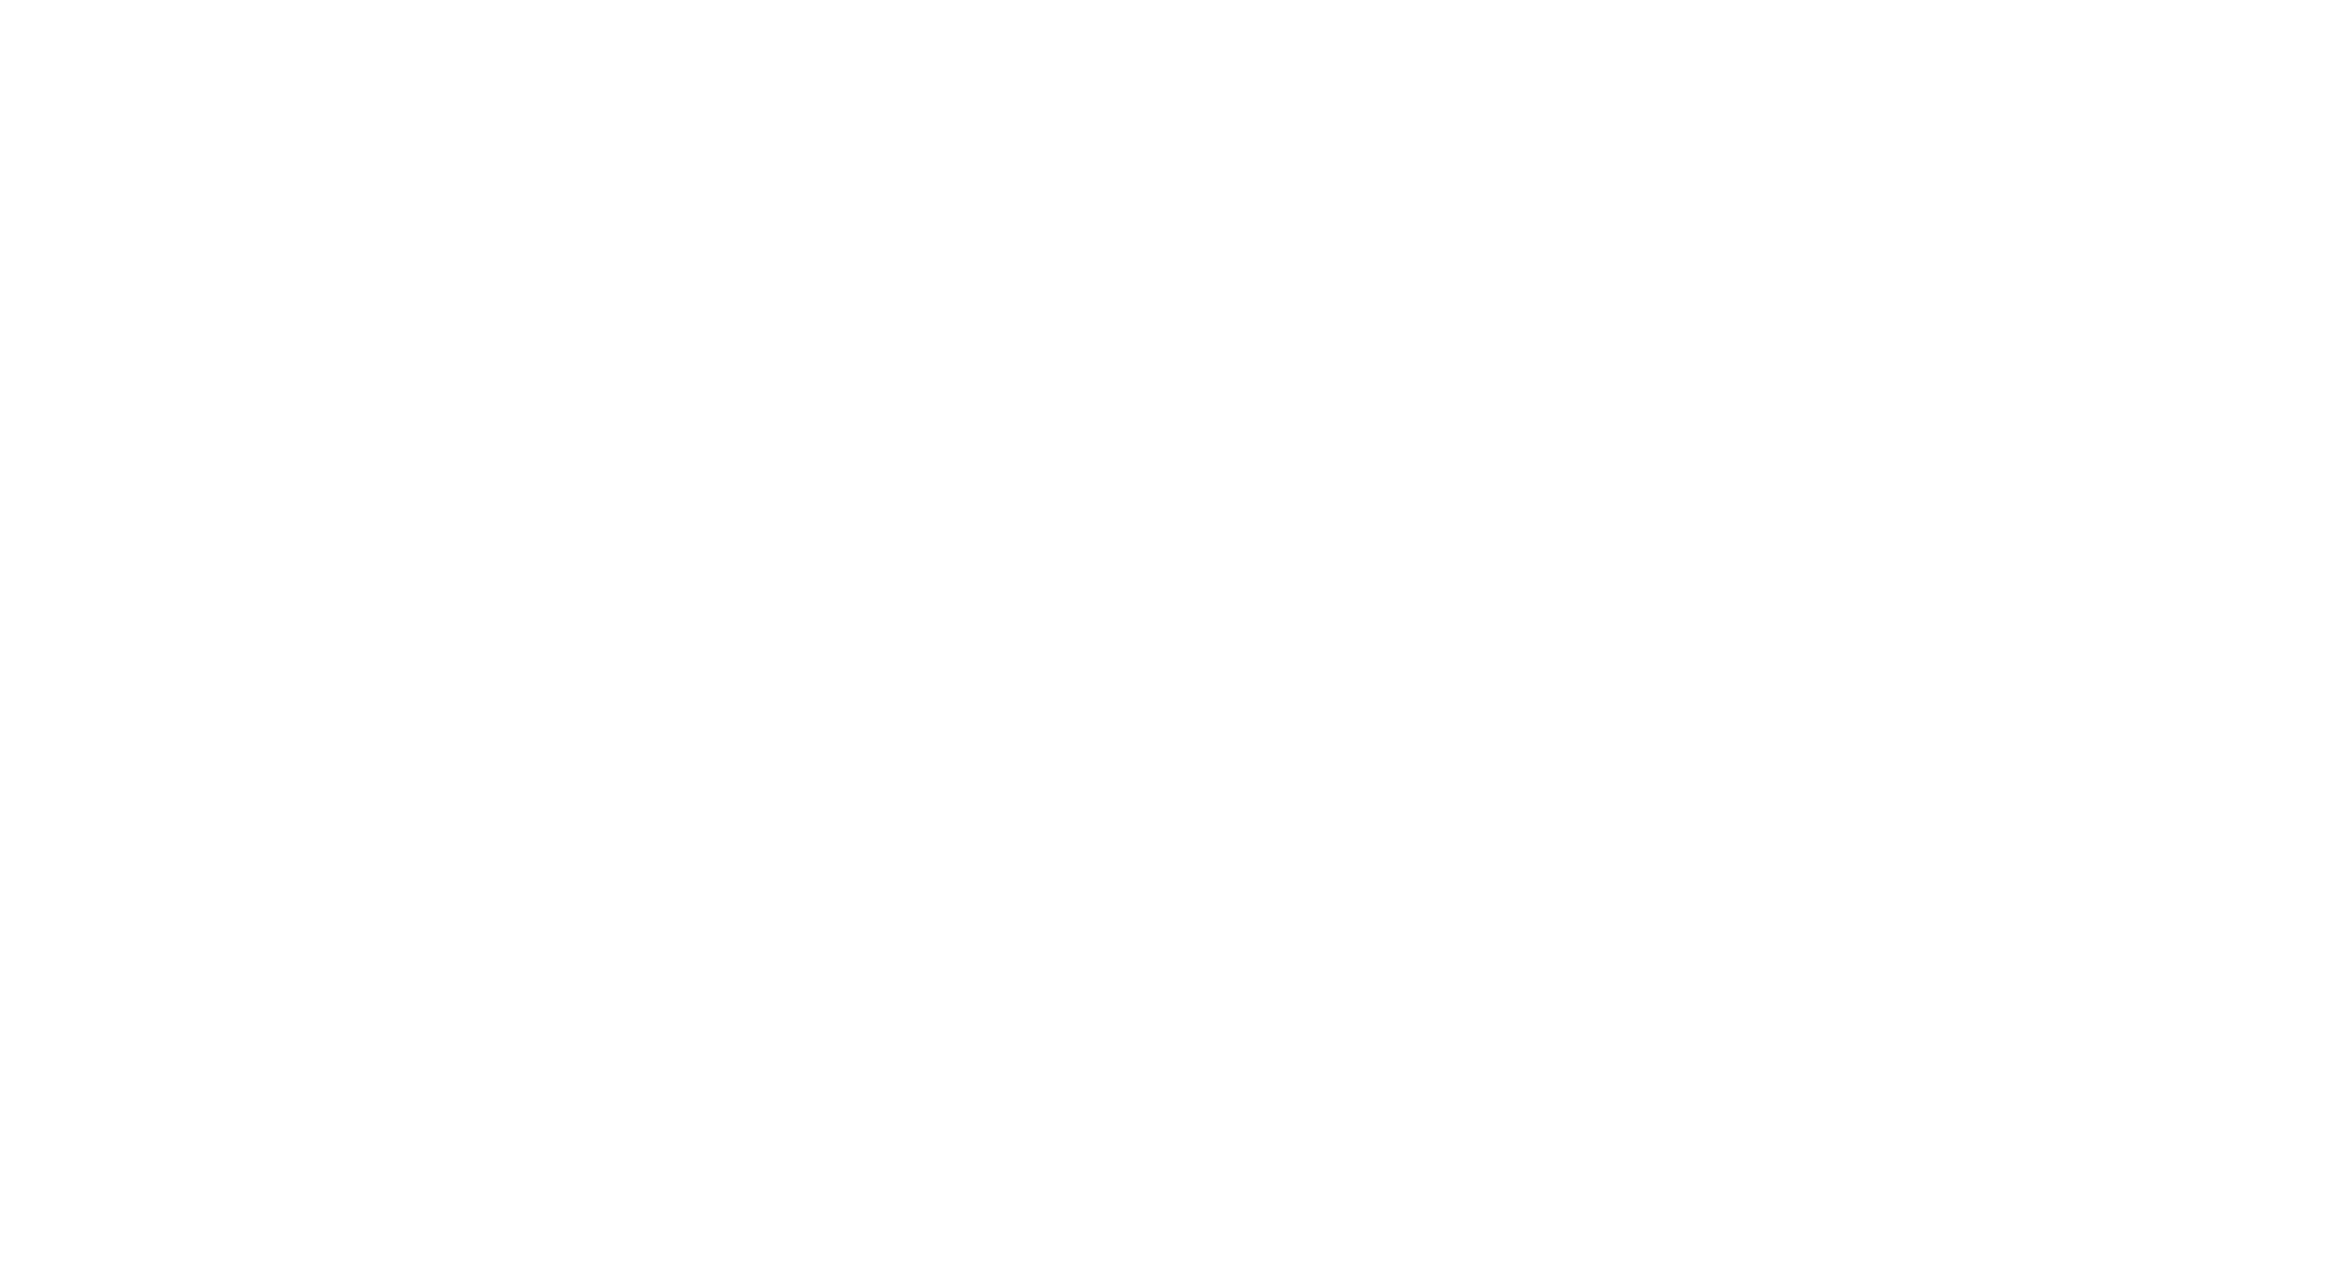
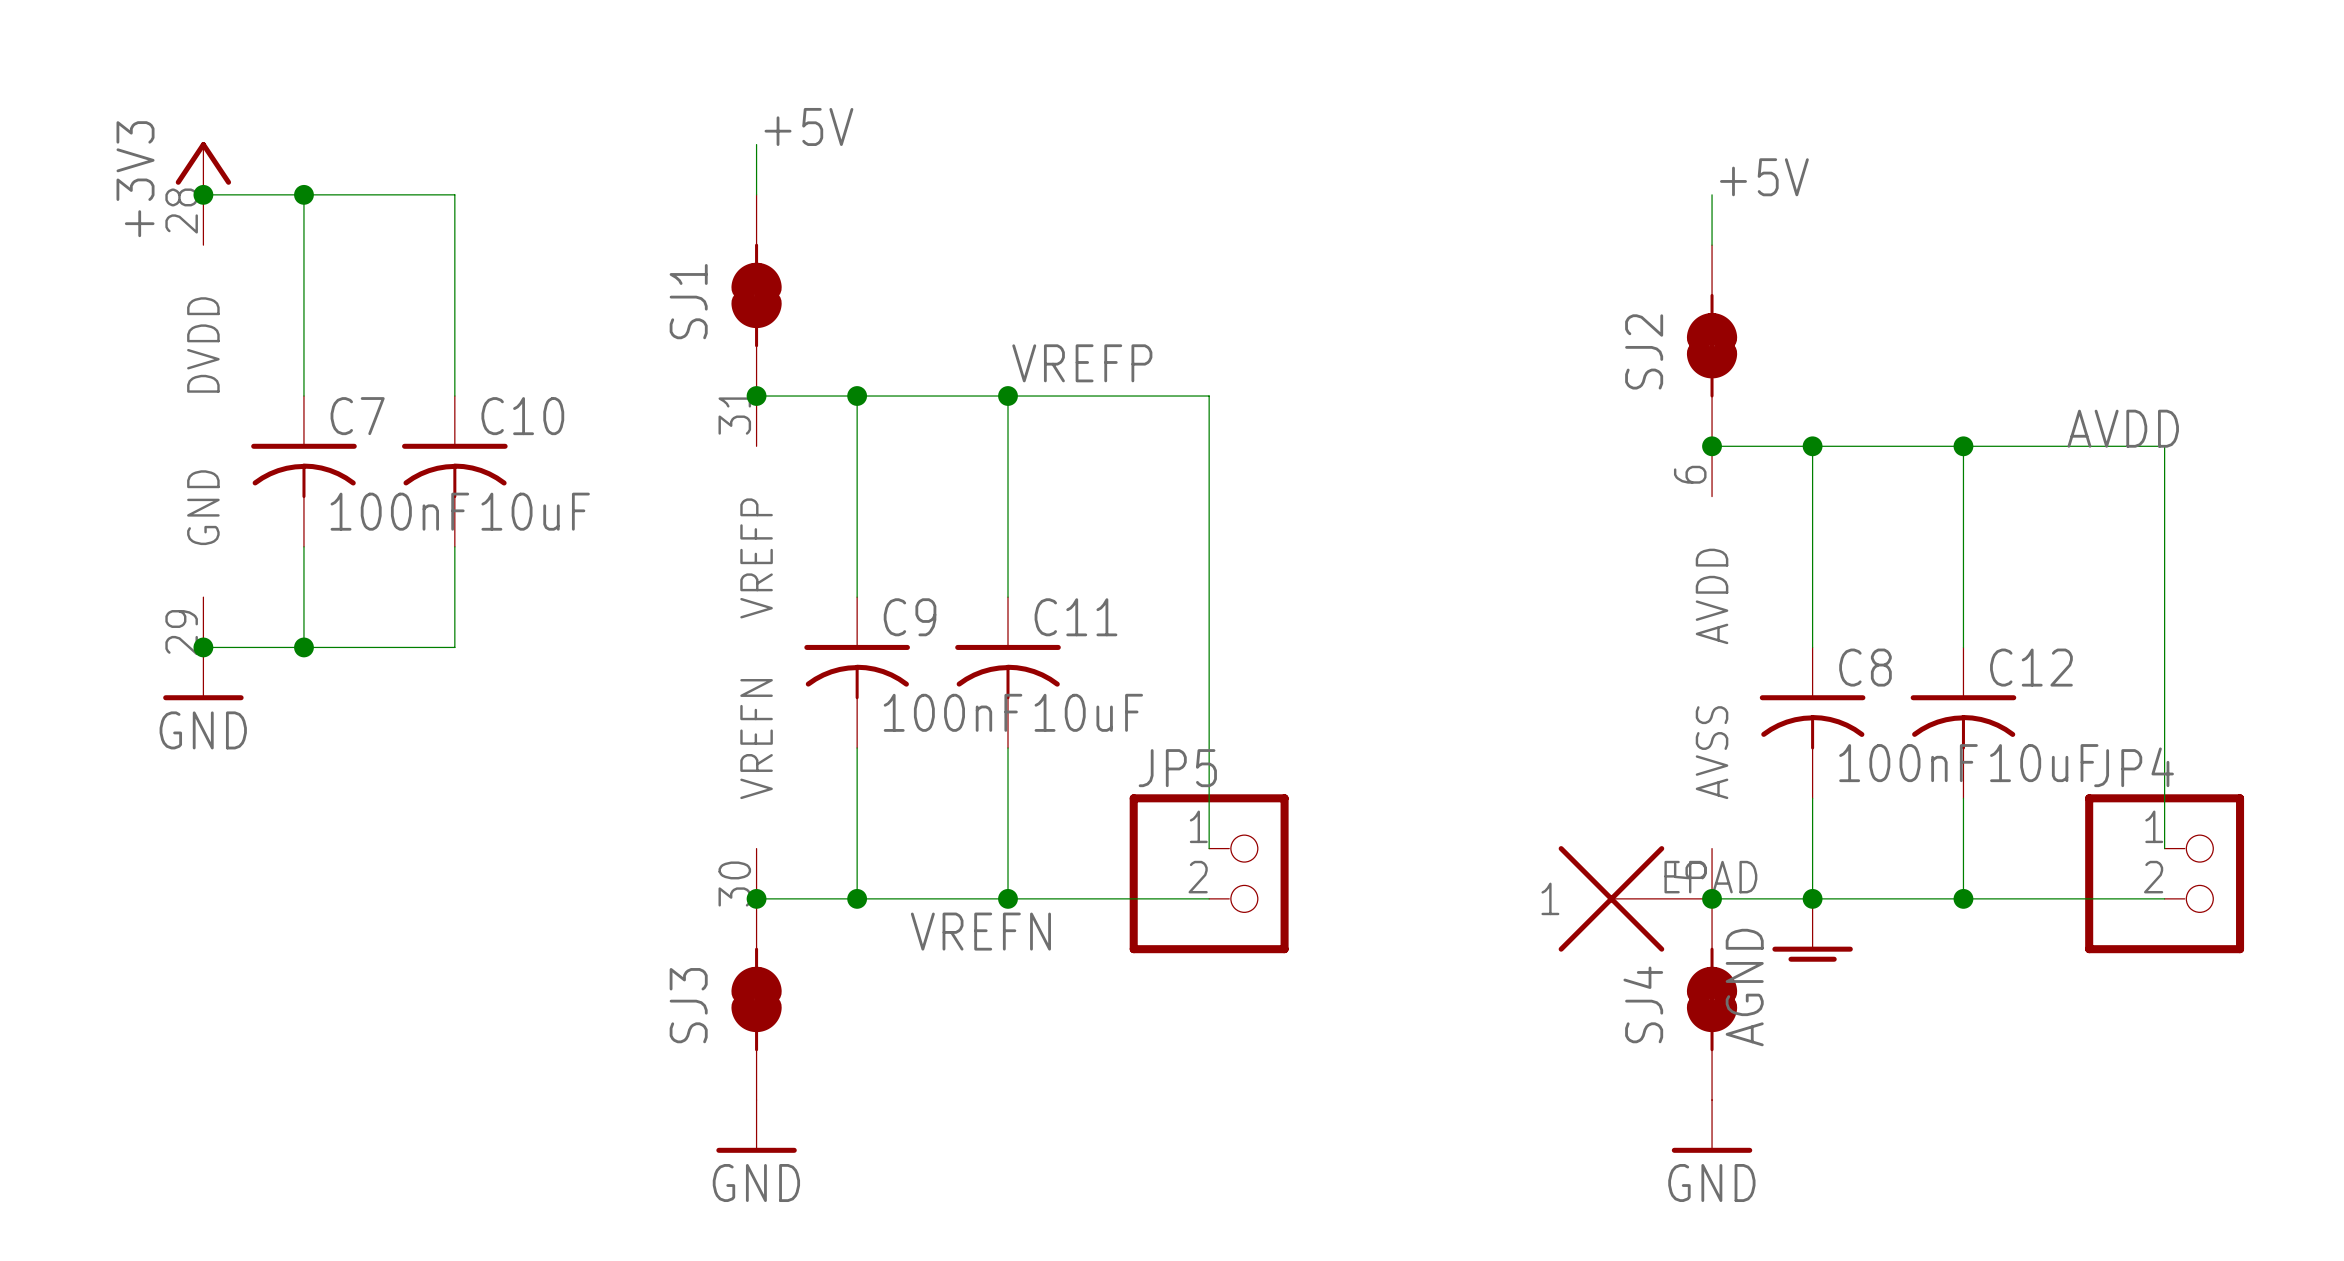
label: none -> +5V (808, 126)
wire: none -> (756, 144) (756, 194)
power symbol: none -> +3V3 (203, 168)
label: none -> +5V (1764, 177)
wire: none -> (203, 194) (454, 194) (454, 396)
junction: none -> (203, 194)
wire: none -> (303, 194) (303, 396)
junction: none -> (303, 194)
wire: none -> (1712, 194) (1712, 245)
SJ1: none -> (756, 295)
SJ2: none -> (1712, 345)
label: none -> VREFP (1082, 363)
wire: none -> (756, 396) (1209, 396) (1209, 848)
junction: none -> (756, 396)
wire: none -> (857, 396) (857, 597)
junction: none -> (857, 396)
wire: none -> (1008, 396) (1008, 597)
junction: none -> (1008, 396)
part: none -> (203, 421)
label: none -> AVDD (2123, 428)
wire: none -> (1712, 446) (2164, 446) (2164, 848)
junction: none -> (1712, 446)
wire: none -> (1812, 446) (1812, 647)
junction: none -> (1812, 446)
wire: none -> (1963, 446) (1963, 647)
junction: none -> (1963, 446)
C7: none -> 100nF (303, 471)
C10: none -> 10uF (454, 471)
wire: none -> (303, 546) (303, 647)
wire: none -> (454, 546) (454, 647) (203, 647)
junction: none -> (203, 647)
junction: none -> (303, 647)
part: none -> (756, 647)
C9: none -> 100nF (857, 672)
C11: none -> 10uF (1008, 672)
part: none -> (1712, 672)
power symbol: none -> GND (203, 673)
C8: none -> 100nF (1812, 722)
C12: none -> 10uF (1963, 722)
wire: none -> (857, 748) (857, 898)
wire: none -> (1008, 748) (1008, 898)
wire: none -> (1812, 798) (1812, 898)
wire: none -> (1963, 798) (1963, 898)
JP5: none -> (1209, 873)
JP4: none -> (2164, 873)
wire: none -> (756, 898) (1209, 898)
junction: none -> (756, 898)
junction: none -> (857, 898)
junction: none -> (1008, 898)
part: none -> (1635, 898)
wire: none -> (1712, 898) (2164, 898)
junction: none -> (1712, 898)
junction: none -> (1812, 898)
junction: none -> (1963, 898)
power symbol: none -> AGND (1812, 930)
label: none -> VREFN (980, 931)
SJ3: none -> (756, 999)
SJ4: none -> (1712, 999)
power symbol: none -> GND (756, 1126)
power symbol: none -> GND (1712, 1126)

